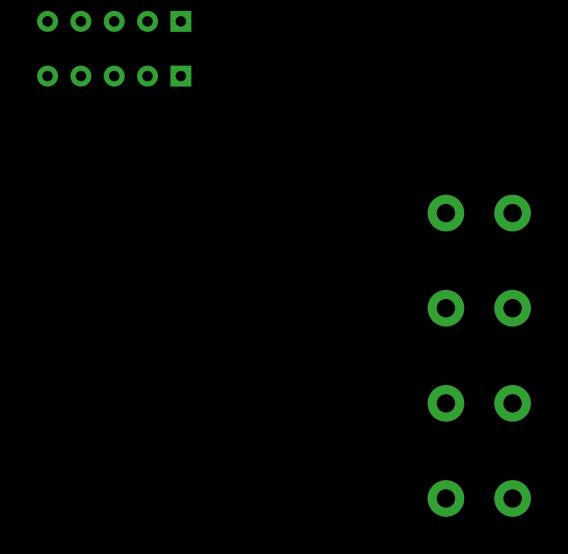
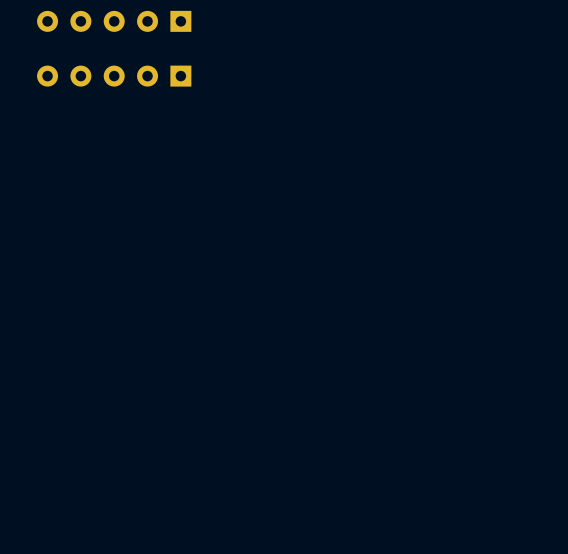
part: (479, 213) -> none
part: (479, 308) -> none
part: (479, 403) -> none
part: (479, 498) -> none

